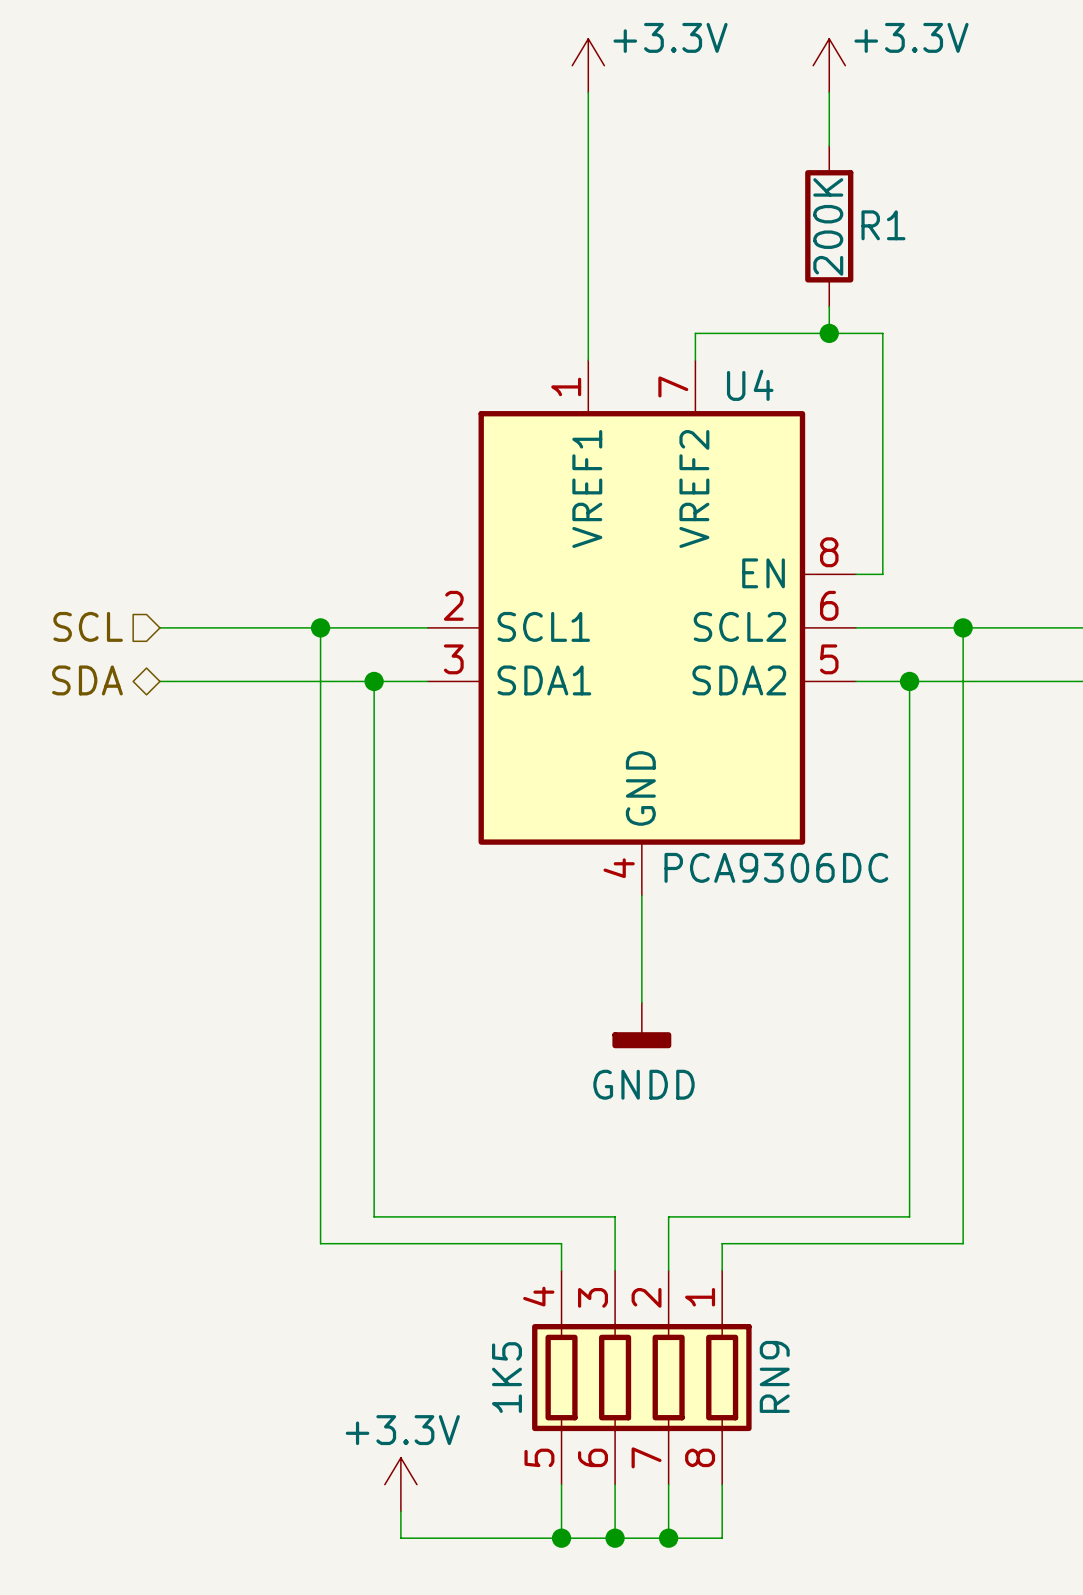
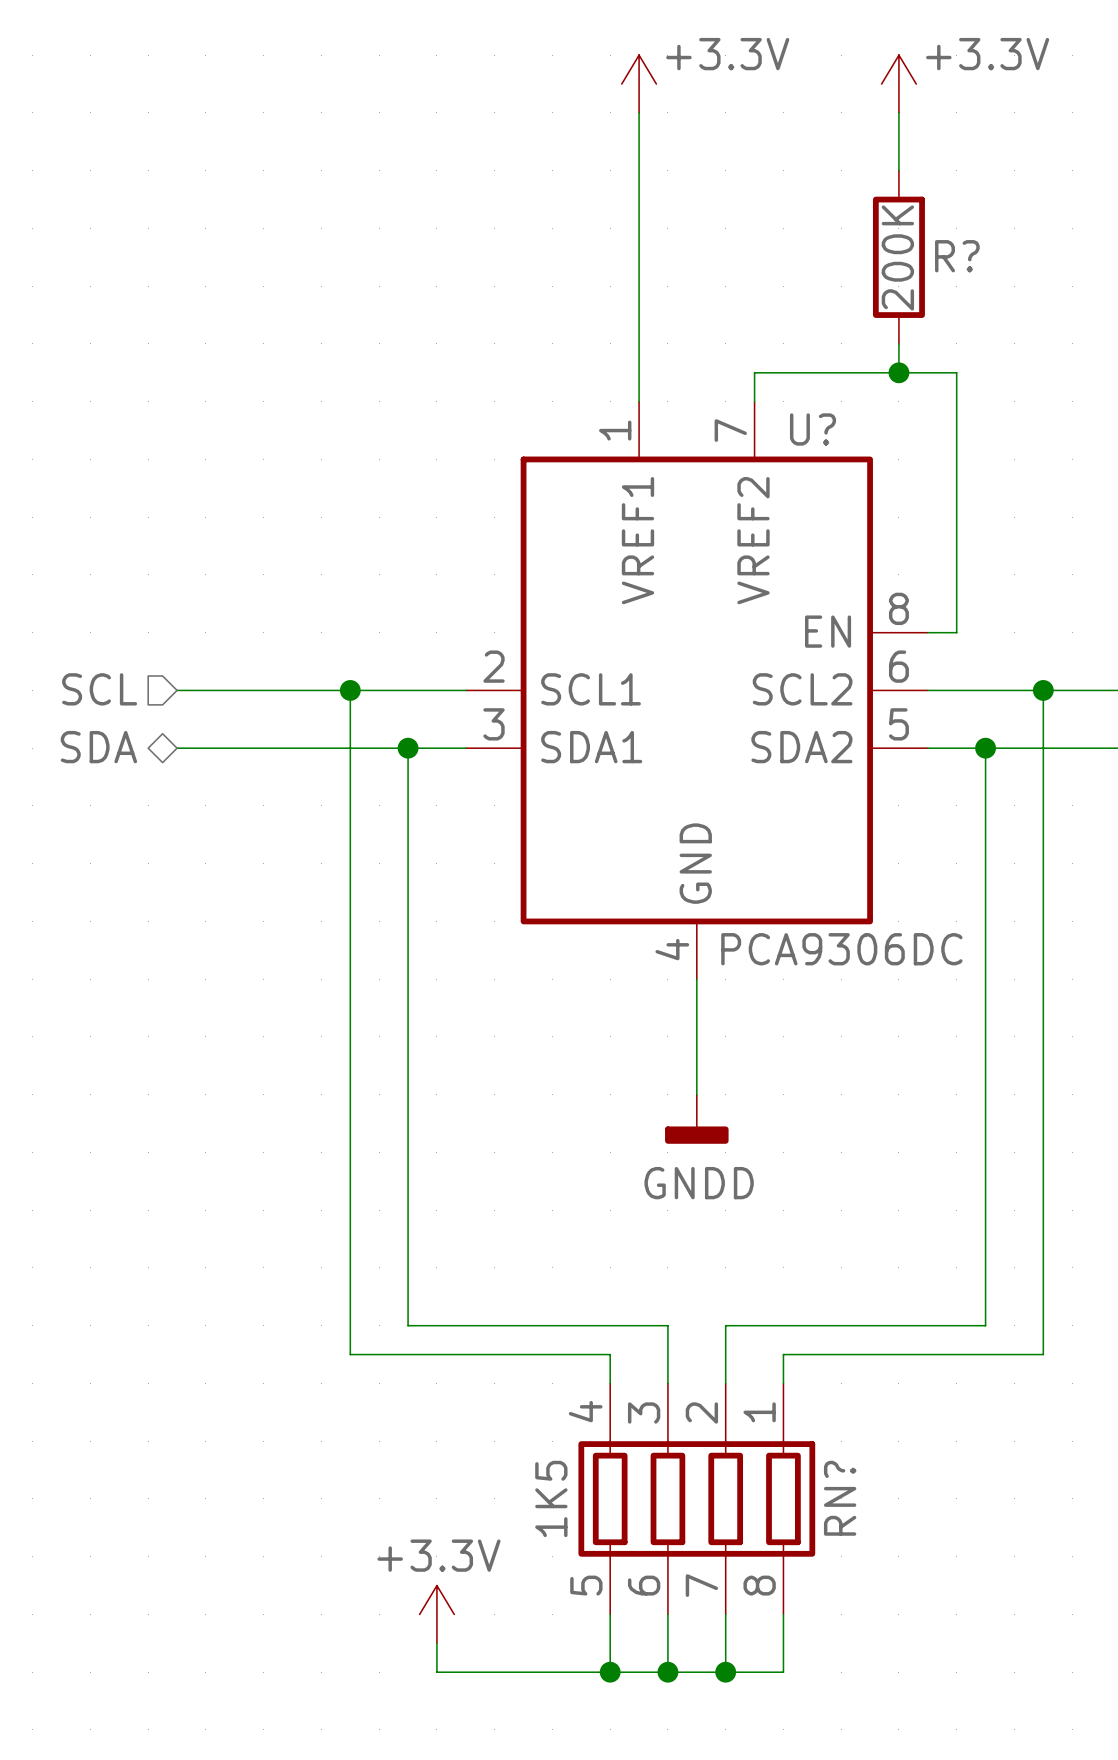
R1 name: R1 (883, 225) -> R? (957, 256)
U4 name: U4 (750, 385) -> U? (813, 429)
RN9 name: RN9 (774, 1376) -> RN? (840, 1498)

